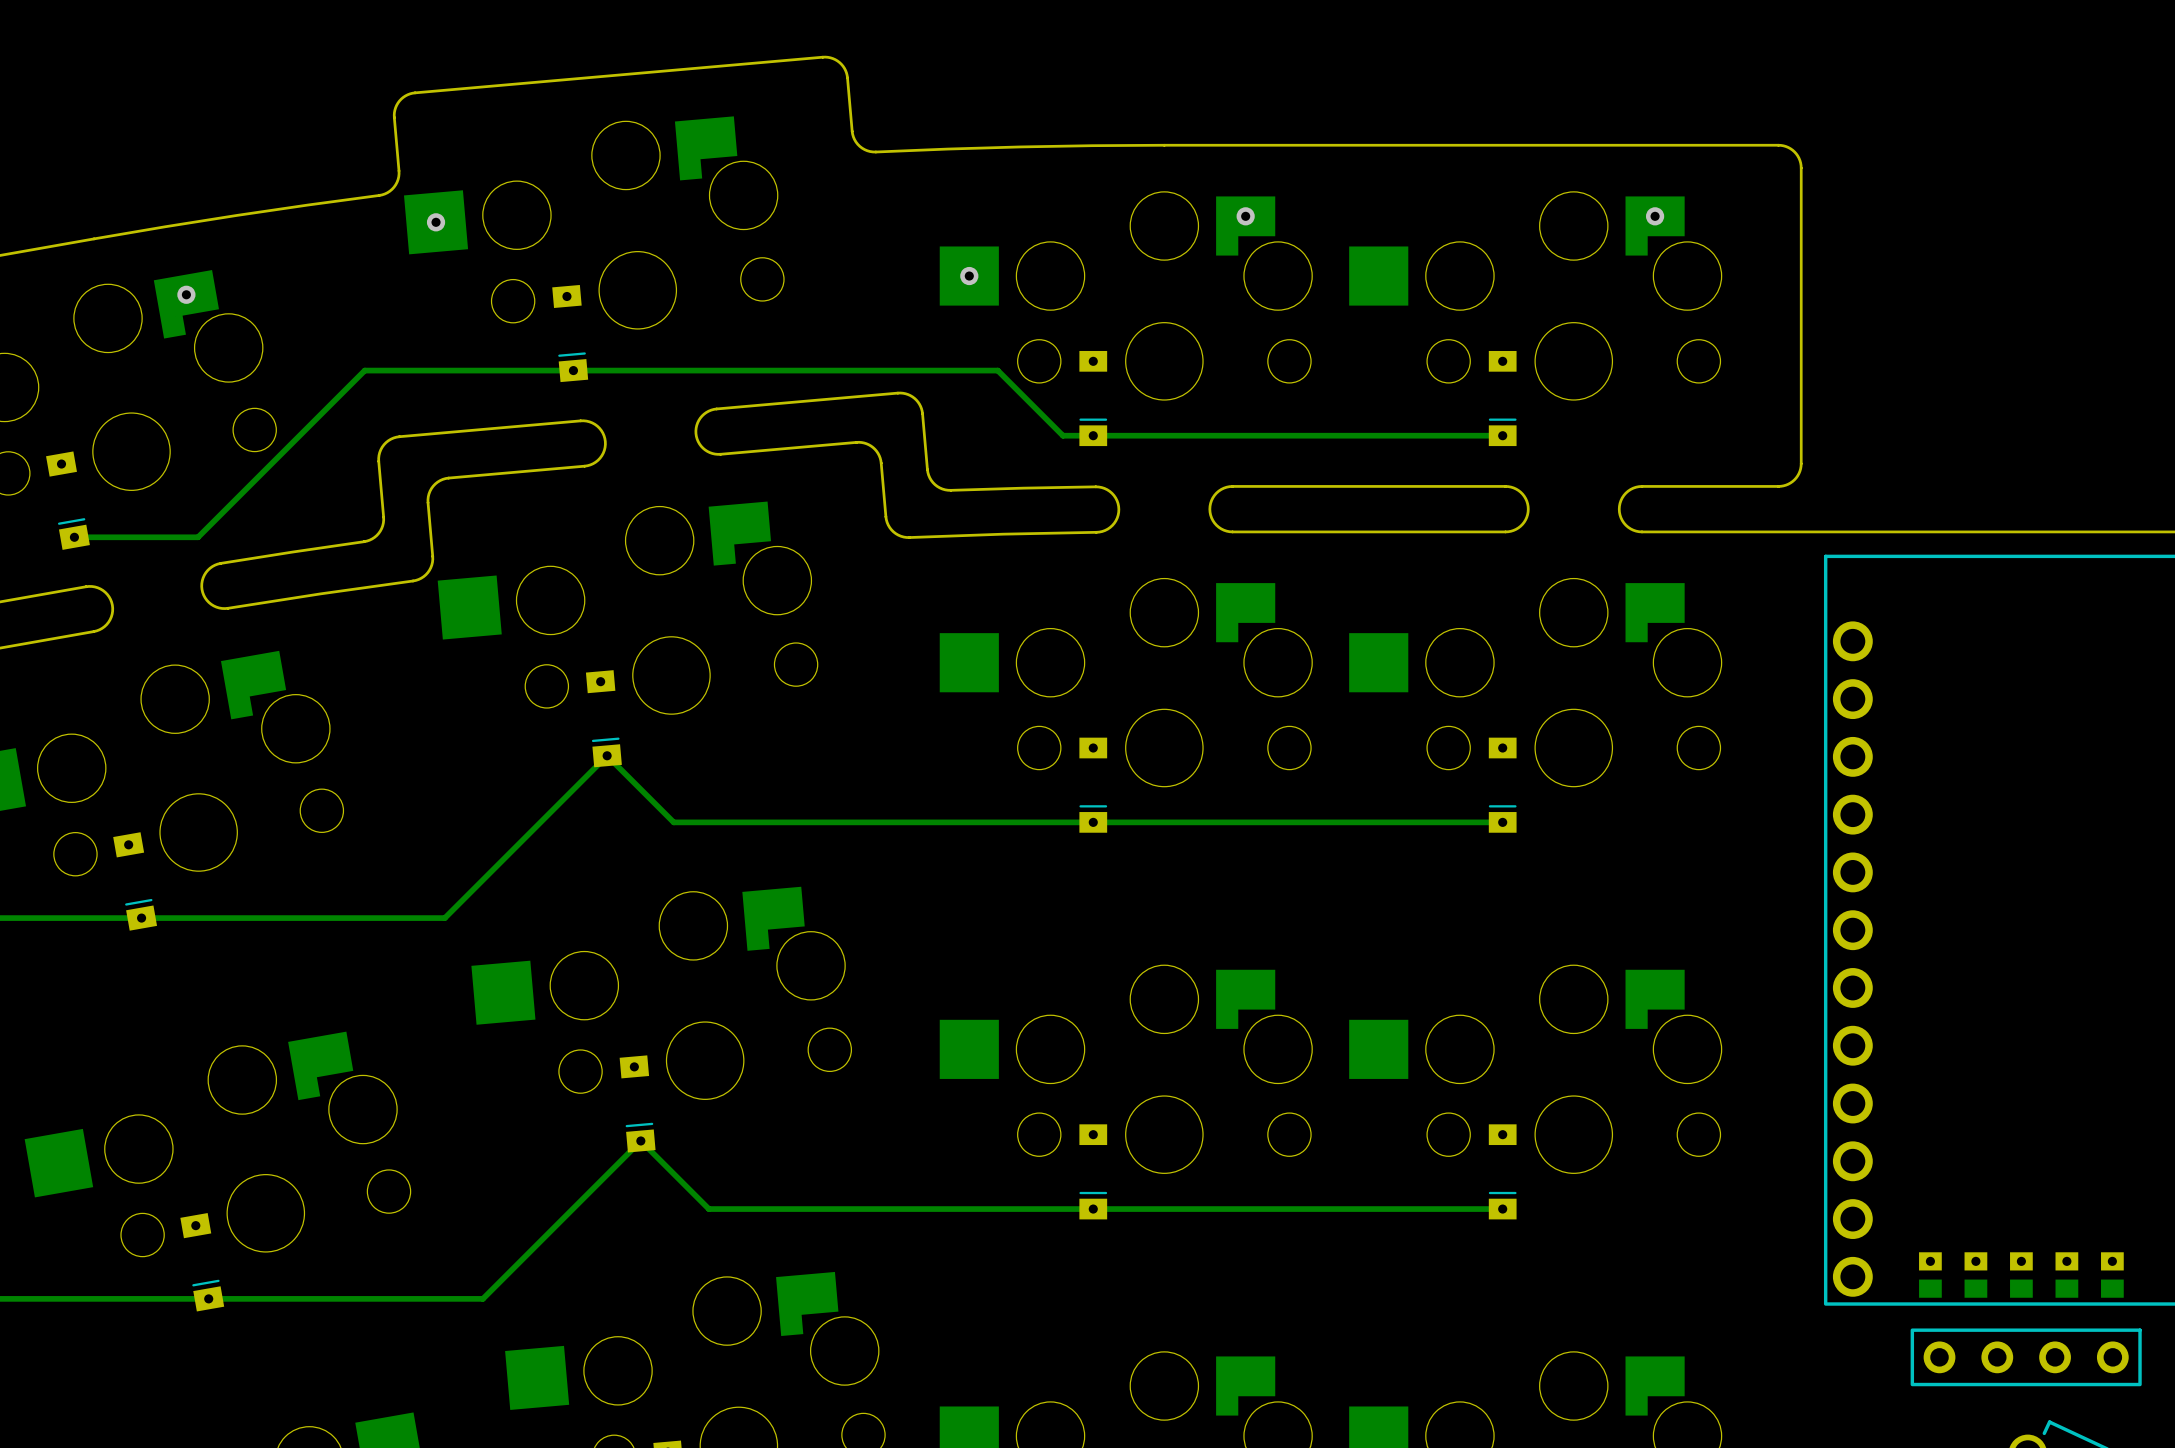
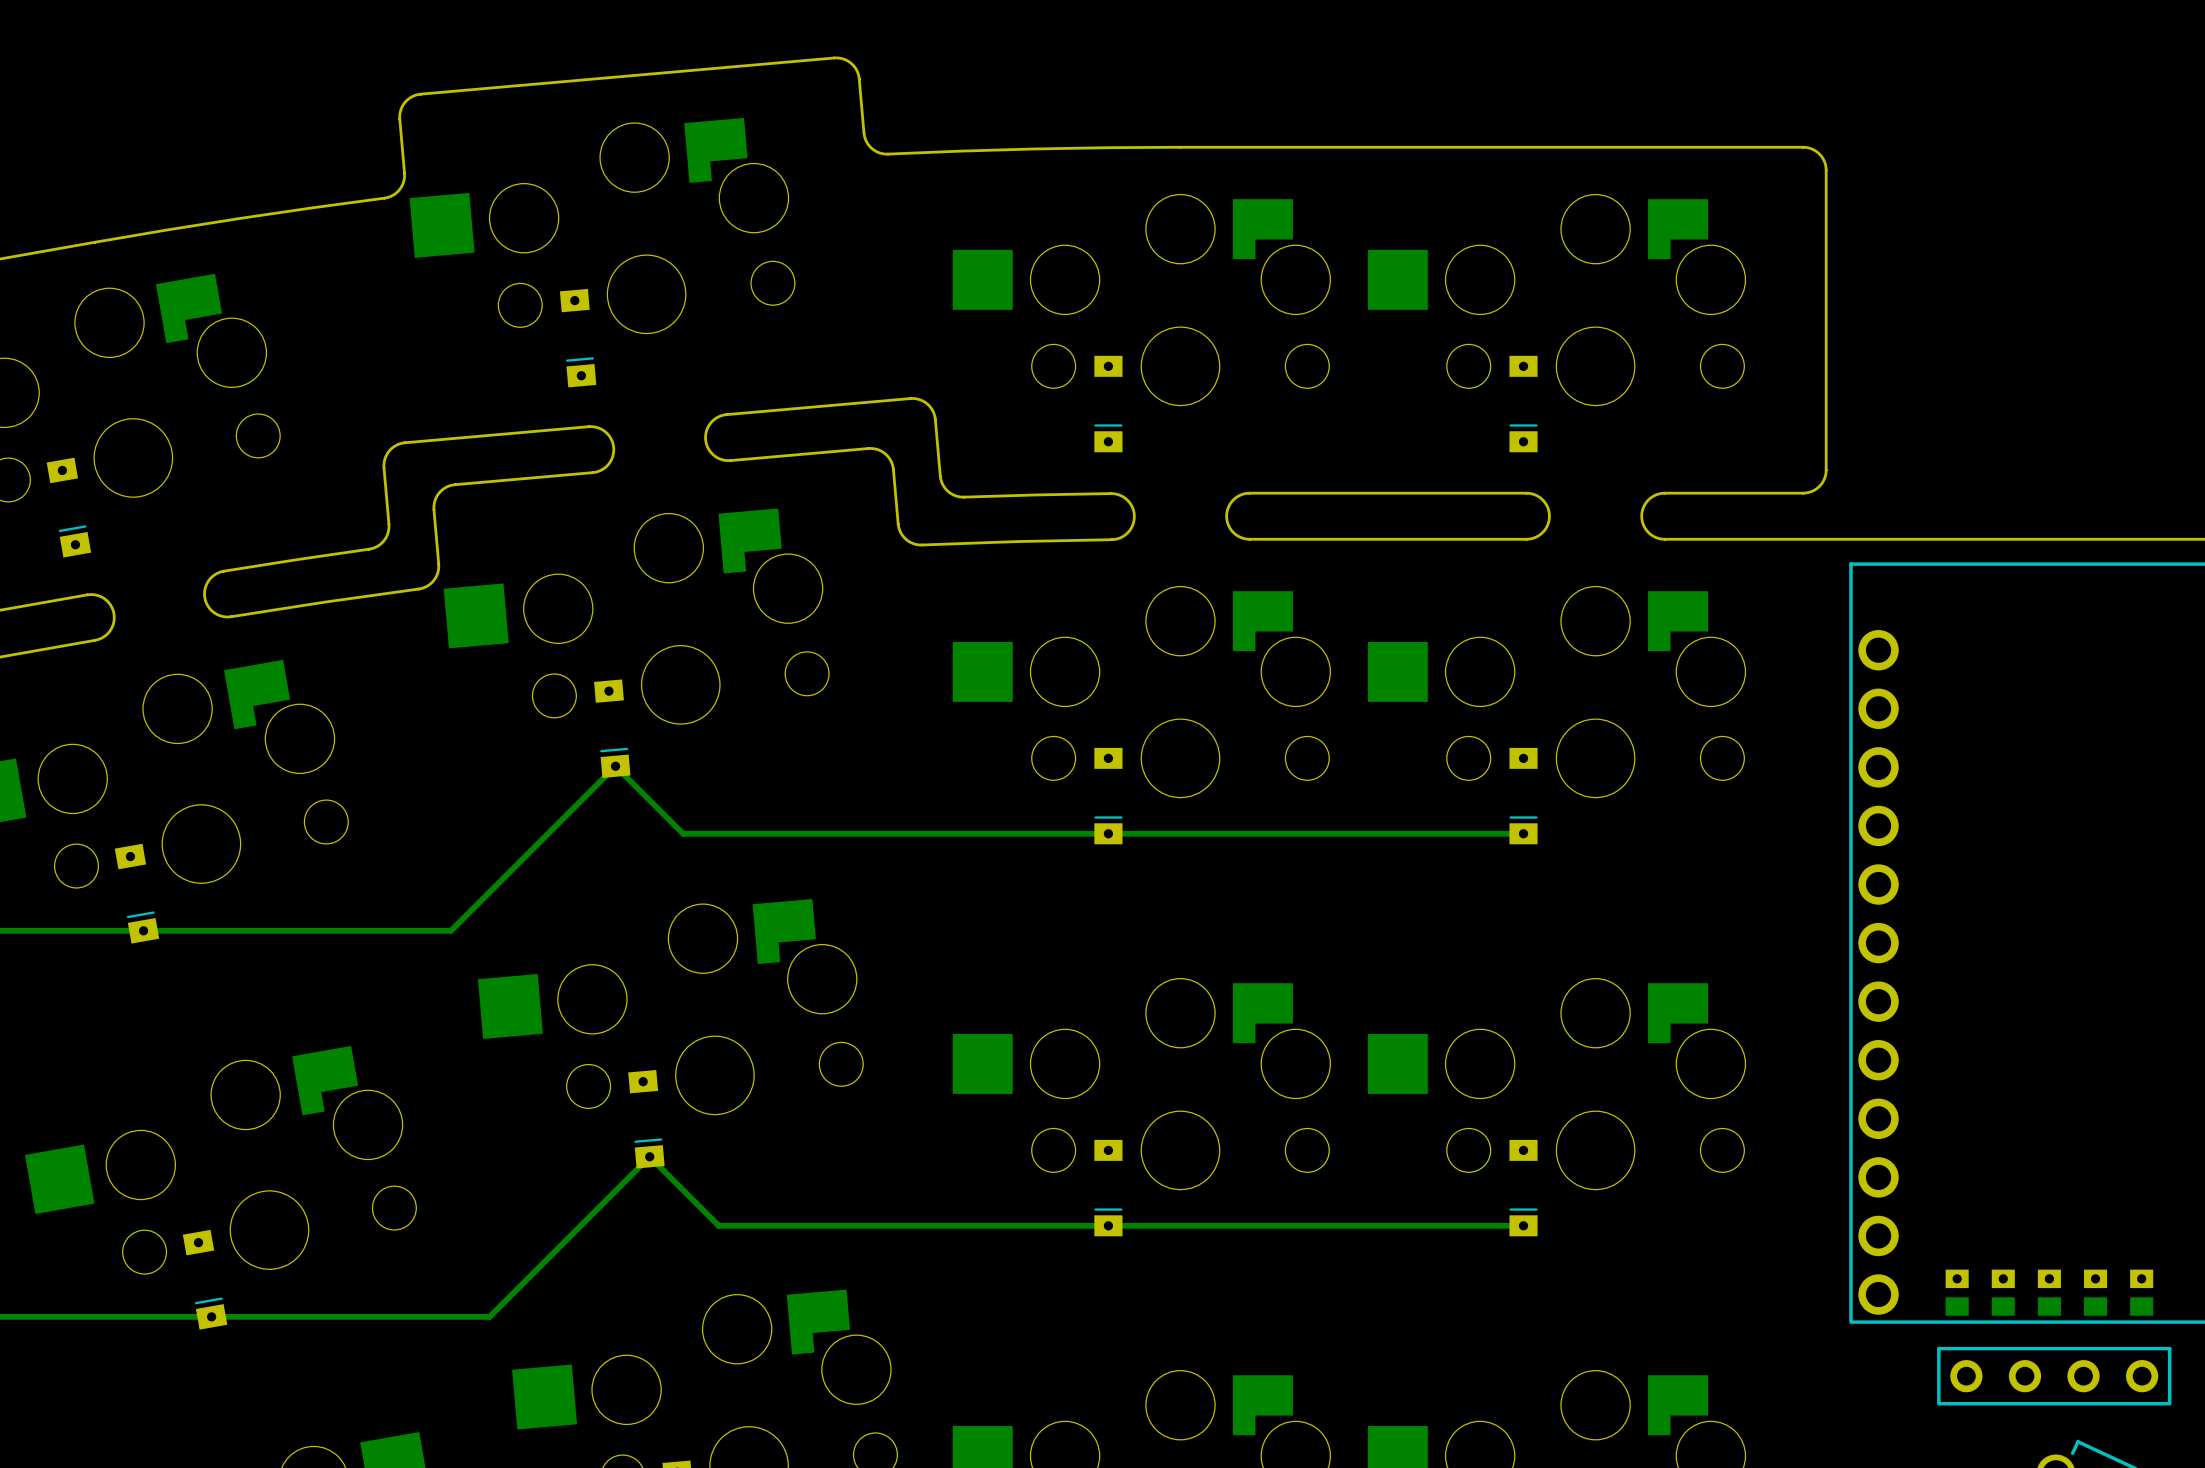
via: (1245, 216) -> none
via: (1655, 216) -> none
via: (436, 222) -> none
via: (969, 276) -> none
via: (186, 294) -> none
track: (1502, 435) (1062, 435) (997, 370) (364, 370) (198, 537) (74, 537) -> none

